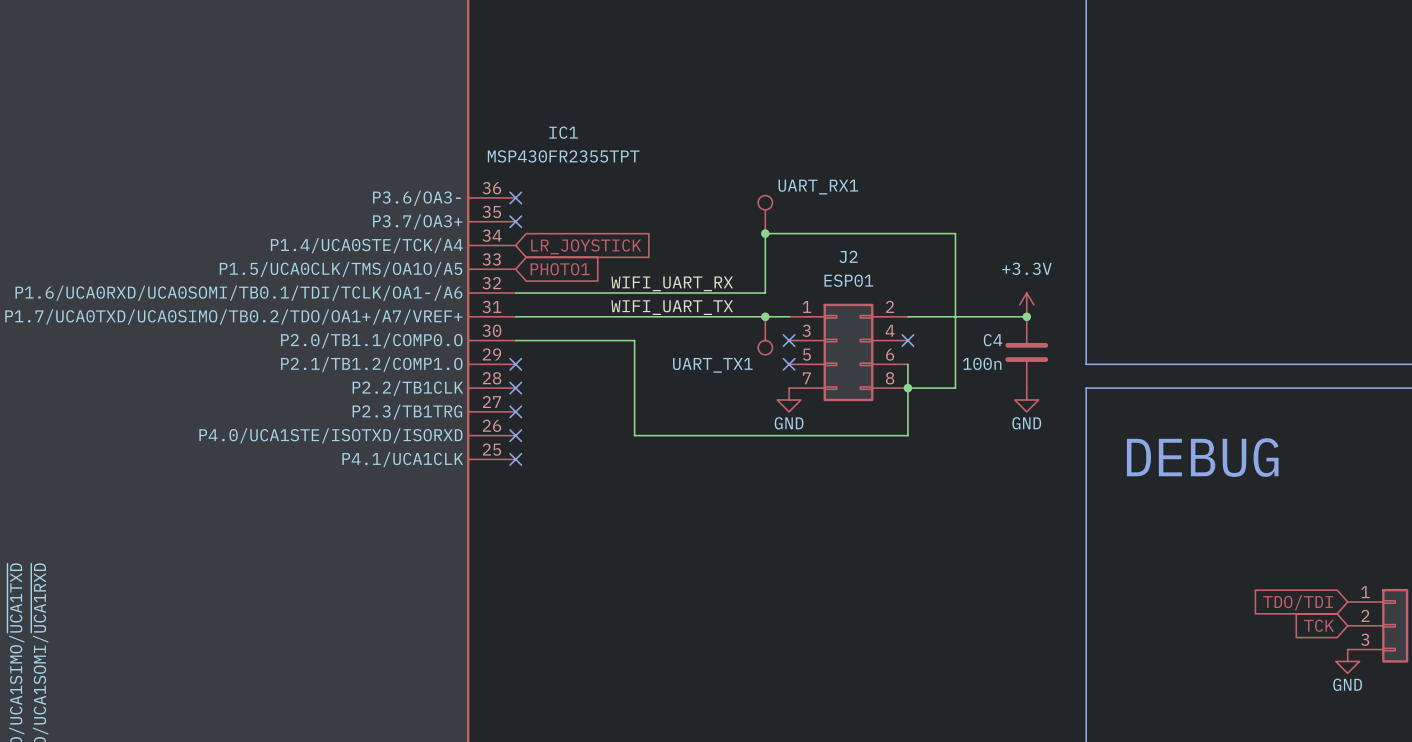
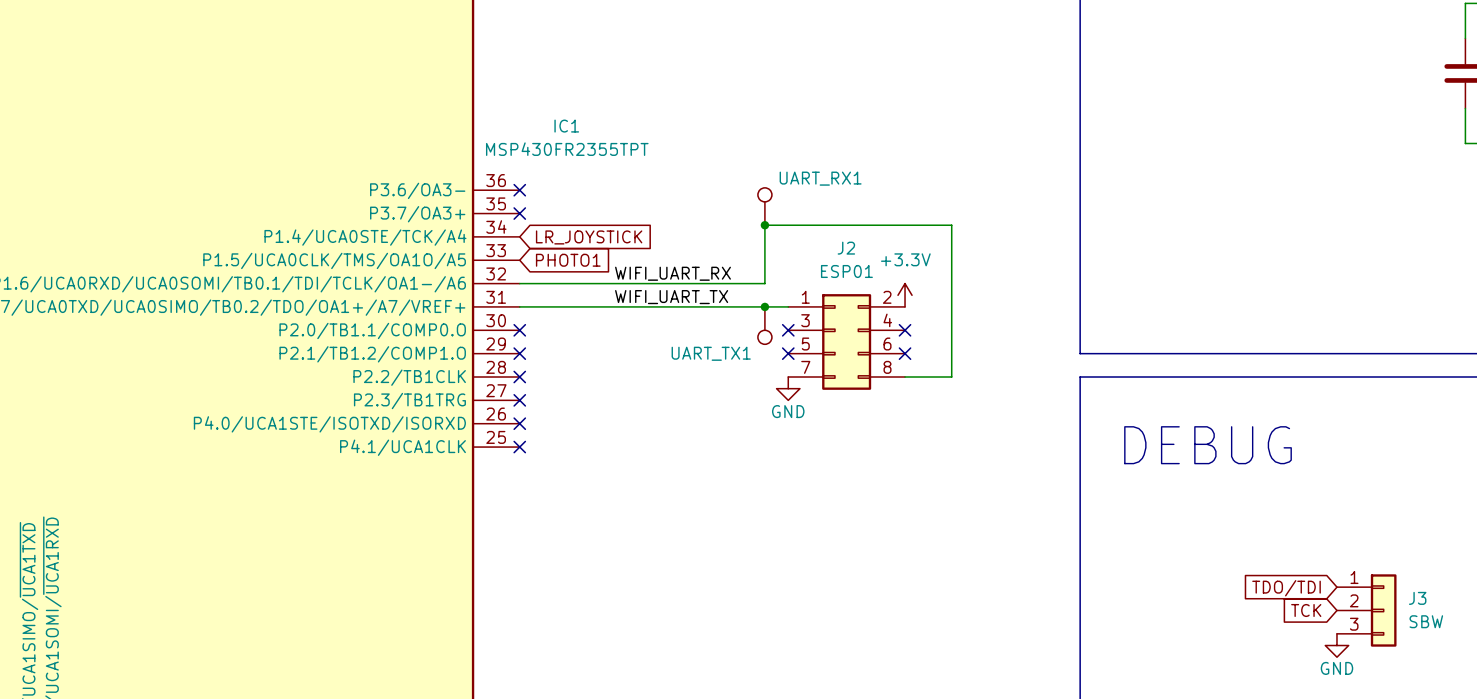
power symbol position: +3.3V (1026, 304) -> +3.3V (905, 295)
wire: (907, 316) (1026, 316) -> none
junction: (1026, 316) -> none
wire: (515, 340) (634, 340) (634, 435) (907, 435) (907, 364) -> none
no-connect mark: none -> (519, 330)
C4: 100n (1026, 352) -> none
no-connect mark: none -> (905, 353)
junction: (907, 388) -> none
power symbol: GND (1026, 399) -> none

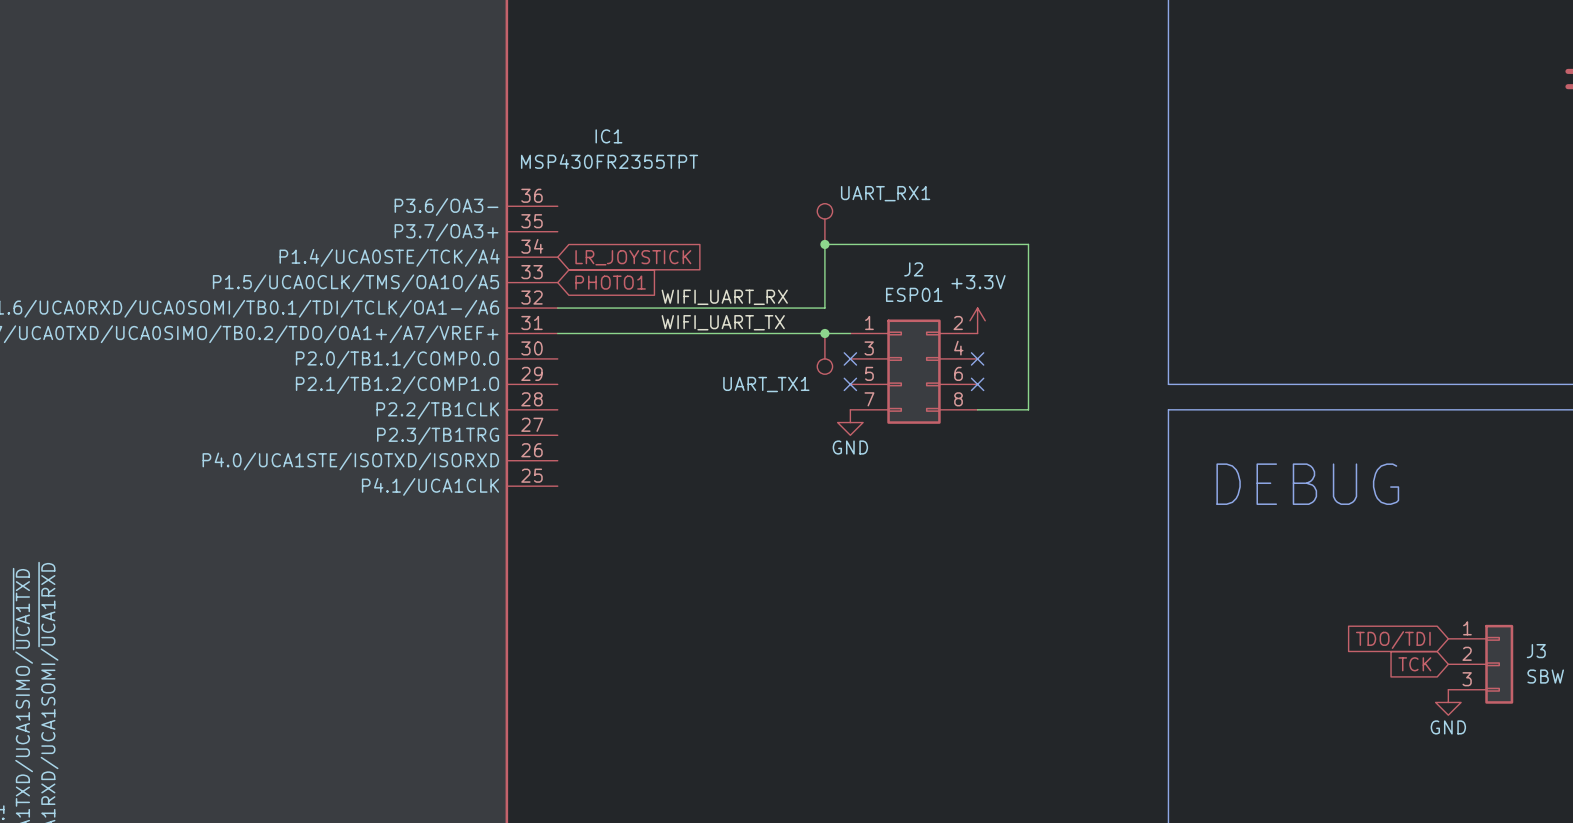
no-connect mark: (519, 190) -> none
no-connect mark: (519, 213) -> none
no-connect mark: (519, 330) -> none
no-connect mark: (519, 353) -> none
no-connect mark: (519, 377) -> none
no-connect mark: (519, 400) -> none
no-connect mark: (519, 423) -> none
no-connect mark: (519, 447) -> none

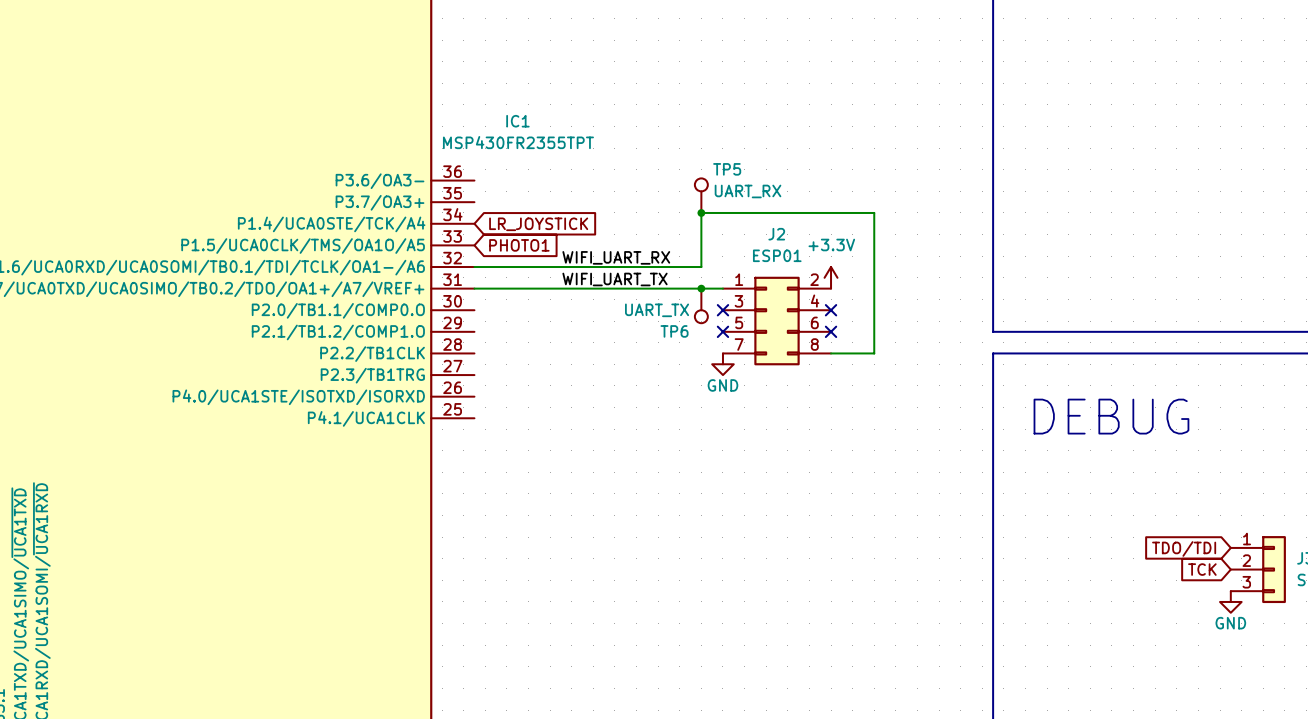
UART_RX1 name: UART_RX1 (885, 193) -> TP5 (727, 169)
UART_RX1 value: none -> UART_RX (748, 191)
UART_TX1 value: none -> UART_TX (657, 310)
UART_TX1 name: UART_TX1 (766, 384) -> TP6 (674, 331)

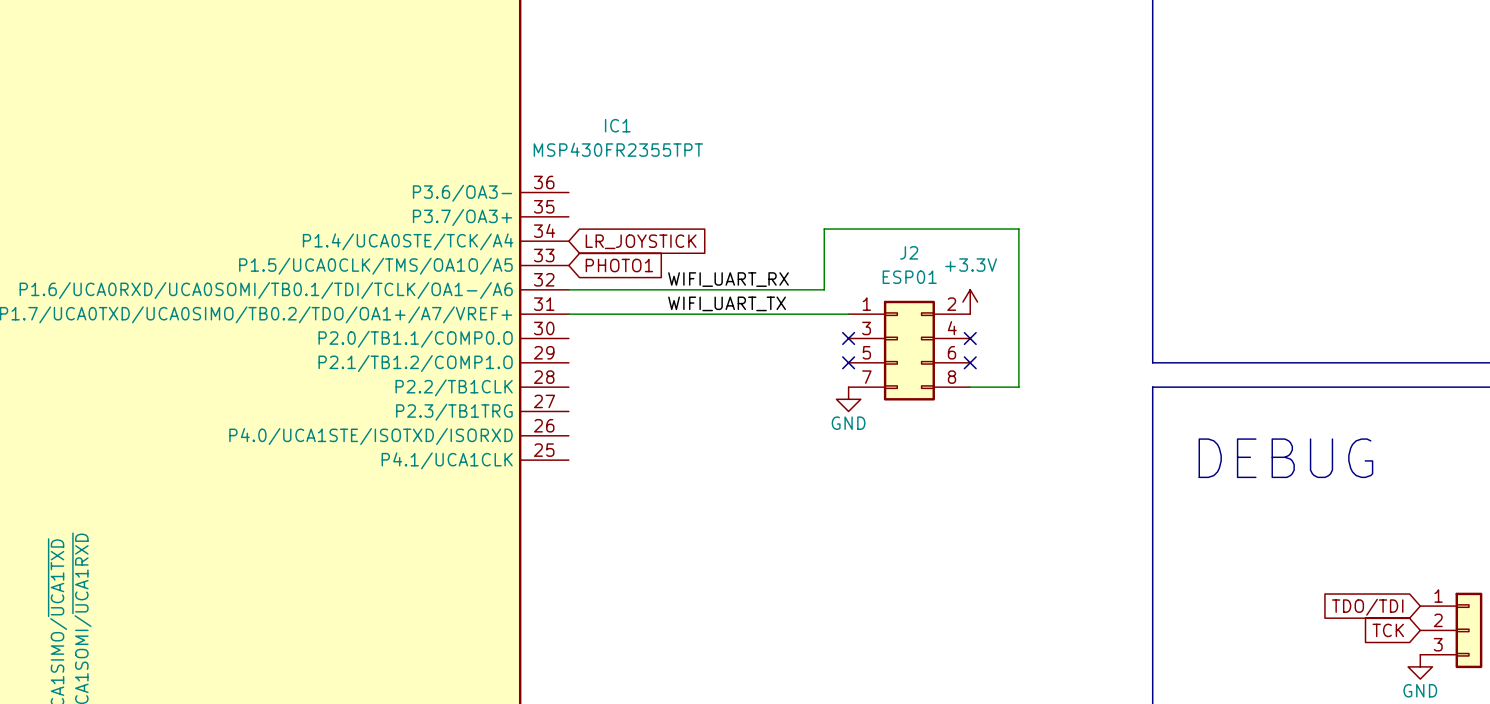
TP5: UART_RX (701, 195) -> none
junction: (701, 212) -> none
junction: (701, 288) -> none
TP6: UART_TX (701, 305) -> none

